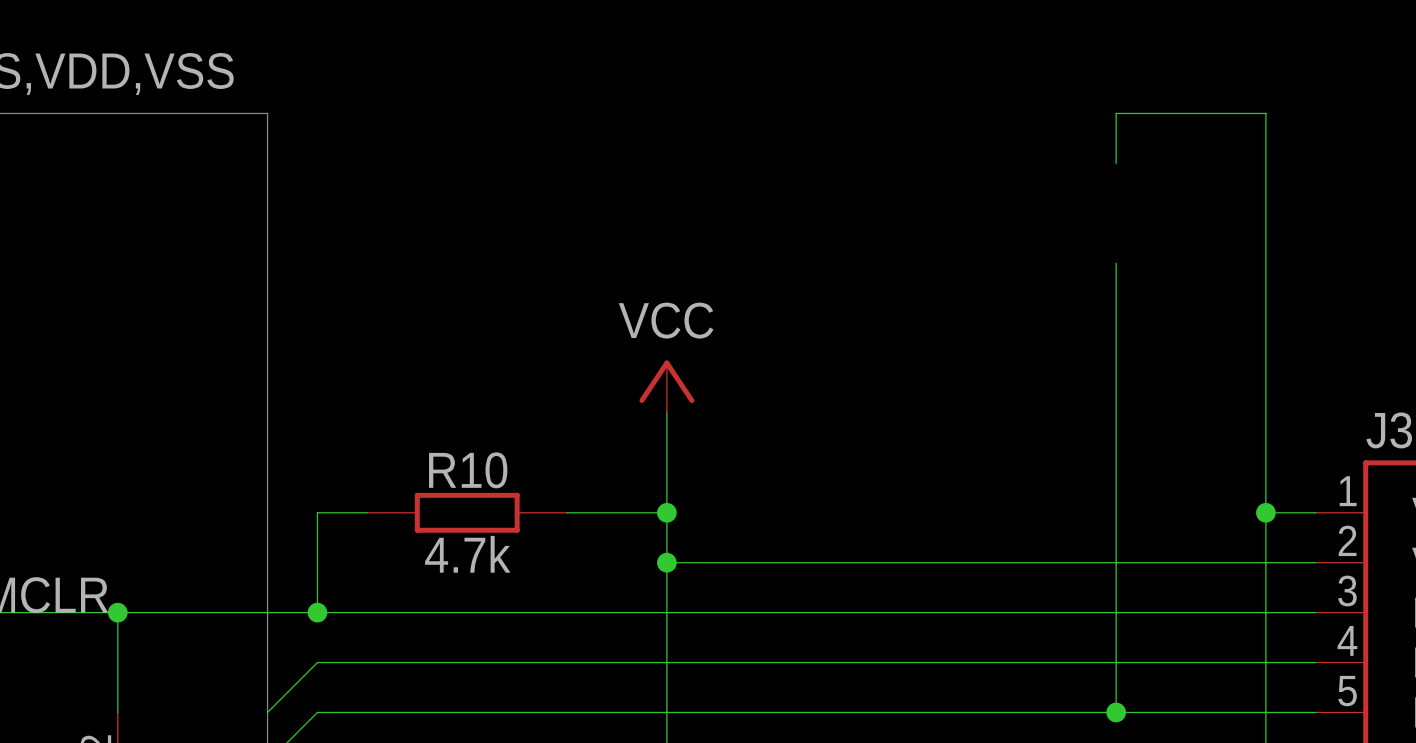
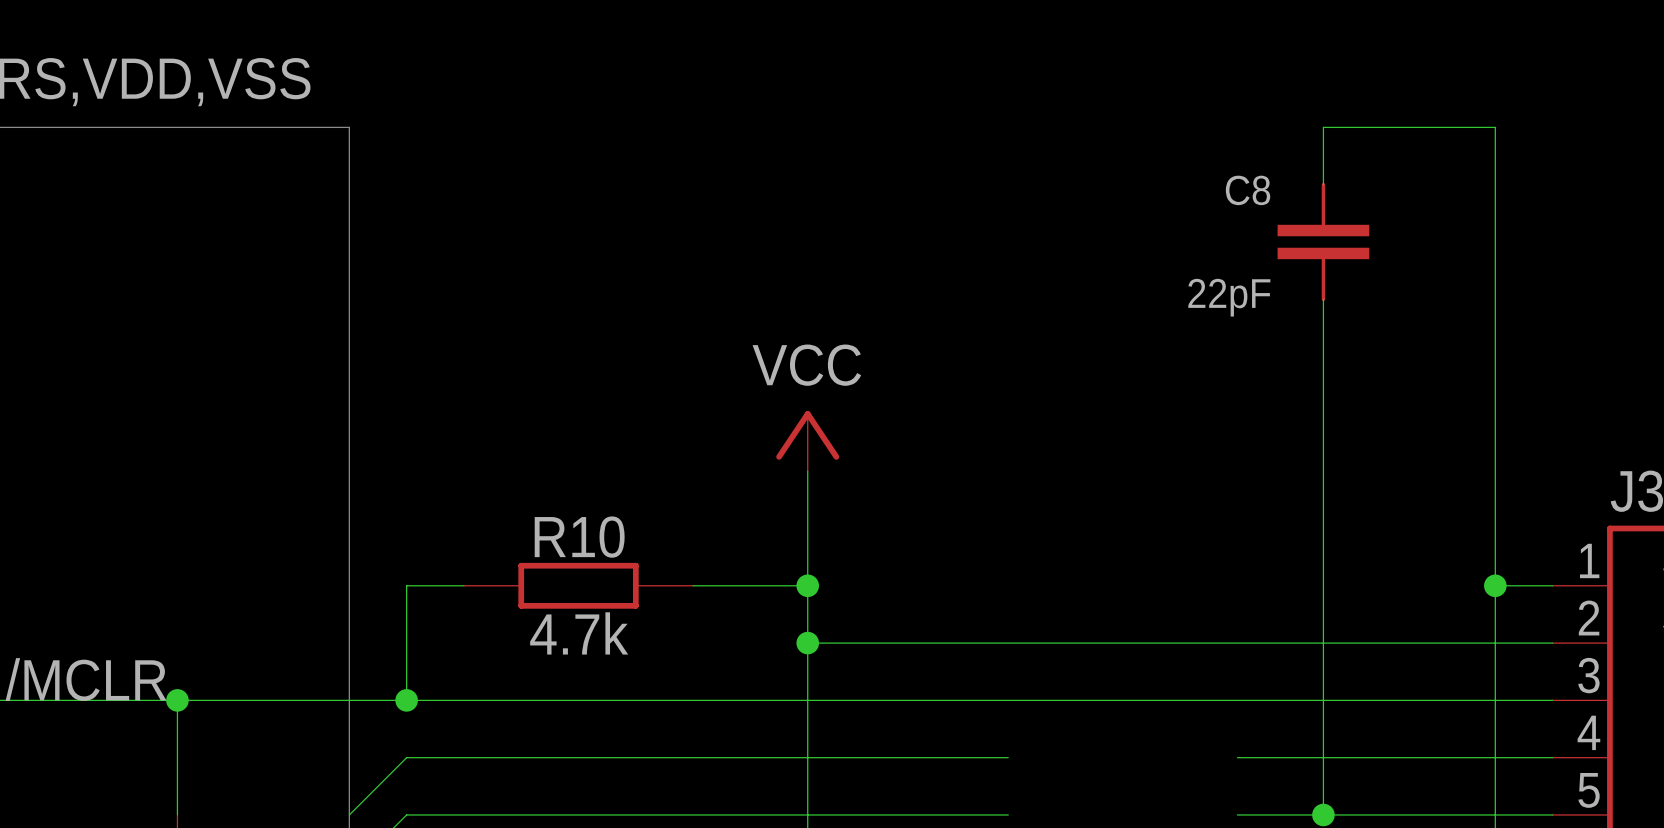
C8: none -> 22pF (1323, 241)
wire: (841, 662) (1041, 662) -> none
wire: (841, 712) (1041, 712) -> none

